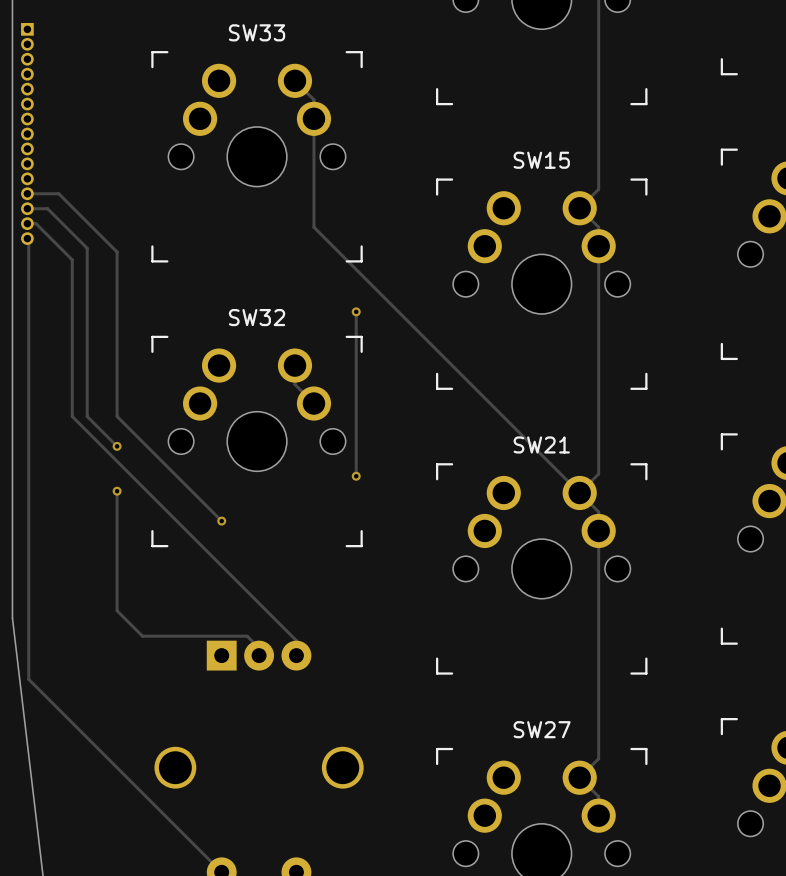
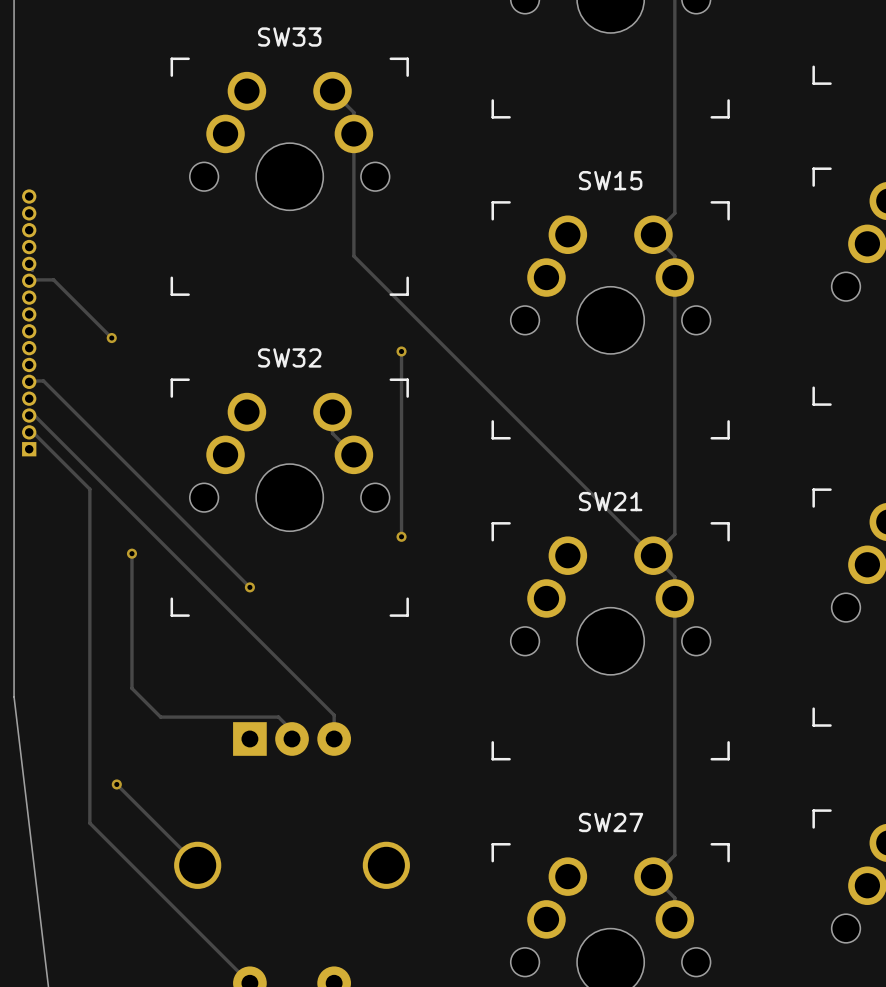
part: (27, 133) -> none
track: (27, 193) (58, 193) (117, 252) (117, 416) -> (30, 380) (43, 380) (131, 469)
track: (27, 208) (47, 208) (87, 248) (87, 416) (117, 446) -> none
track: (27, 223) (36, 223) (72, 259) (72, 416) (296, 640) -> (30, 414) (33, 414) (334, 715) (334, 722)
track: (28, 239) (28, 679) (79, 730) -> (30, 430) (89, 489) (89, 823)
track: none -> (30, 279) (53, 279) (111, 338)
part: none -> (29, 322)
via: none -> (111, 338)
via: (117, 446) -> none
track: none -> (116, 784) (197, 865)
via: none -> (116, 784)

